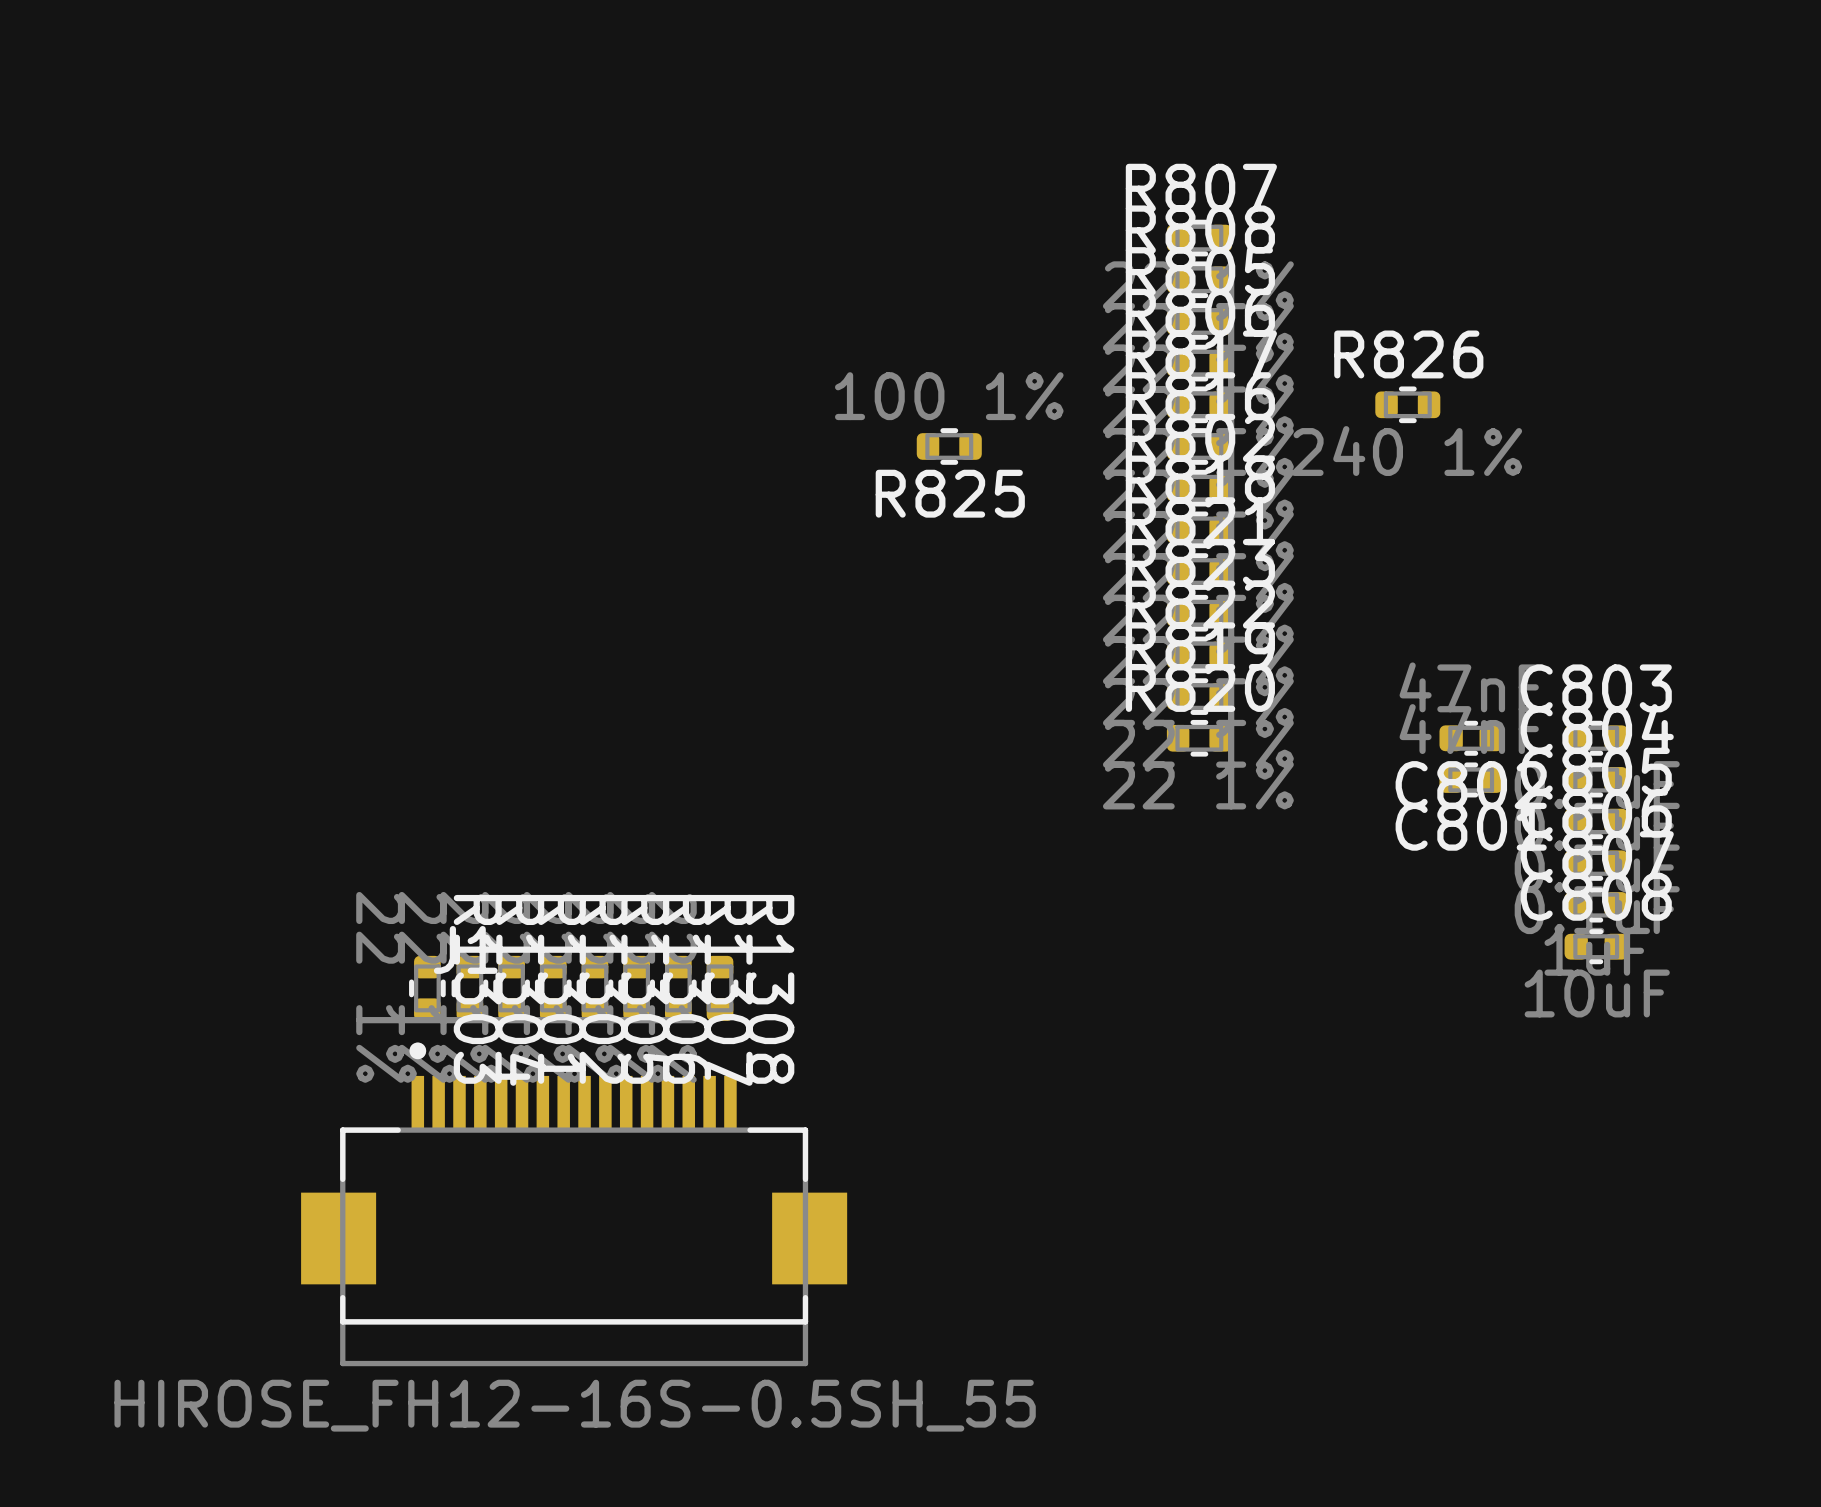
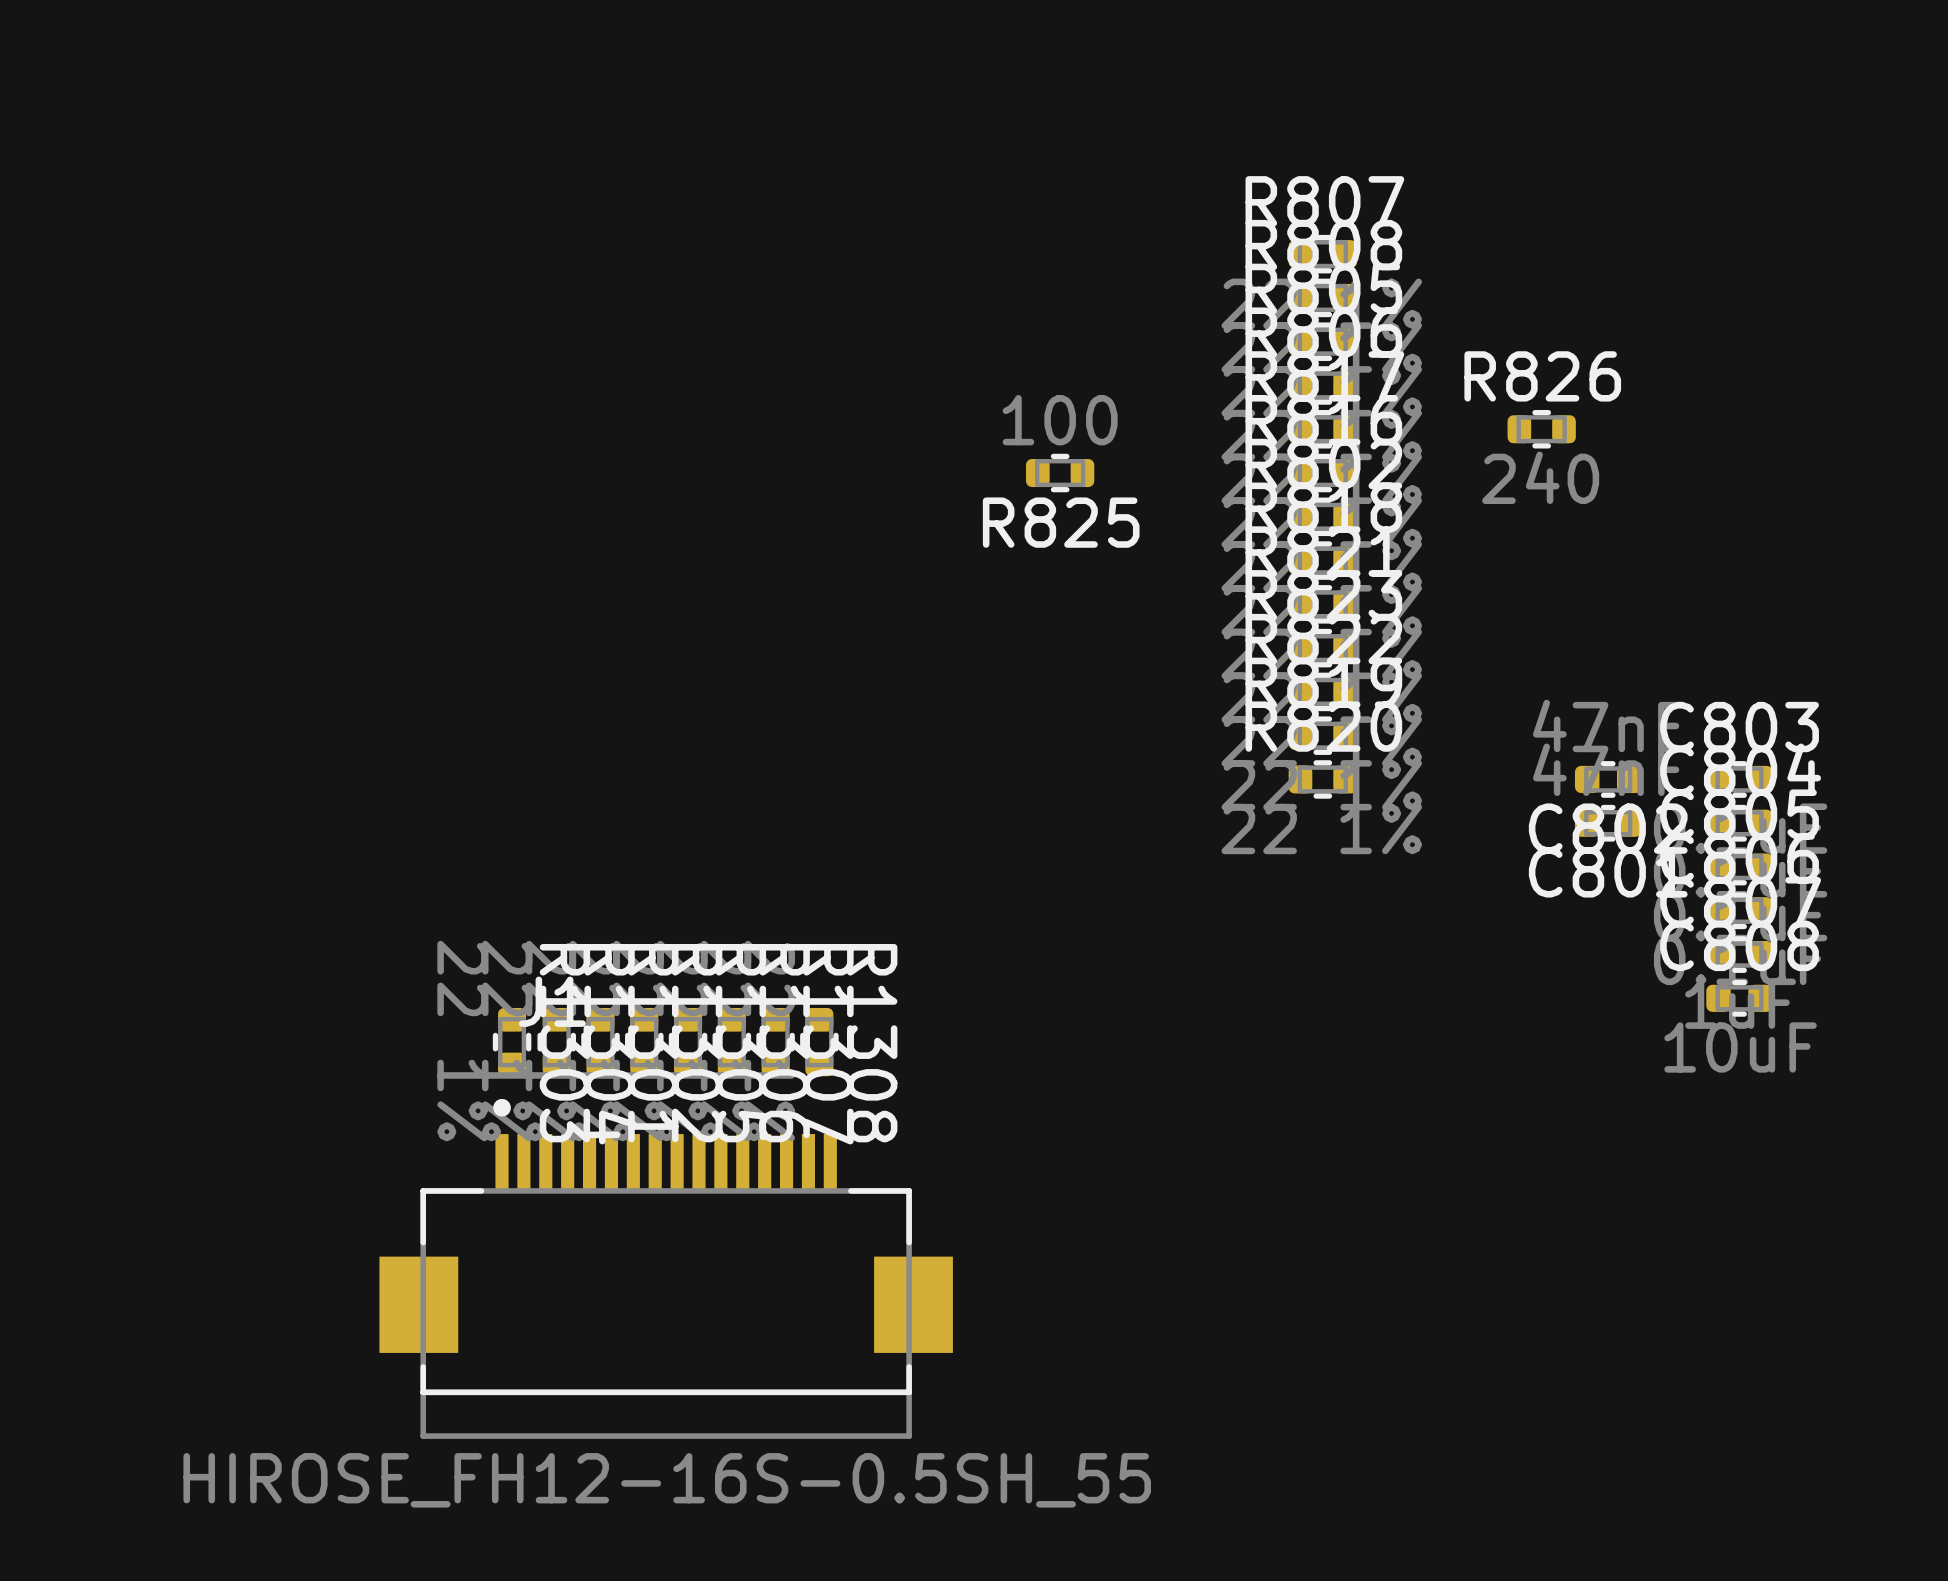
R825 value: 100 1% (949, 396) -> 100 (1060, 420)
R826 value: 240 1% (1406, 451) -> 240 (1540, 477)

